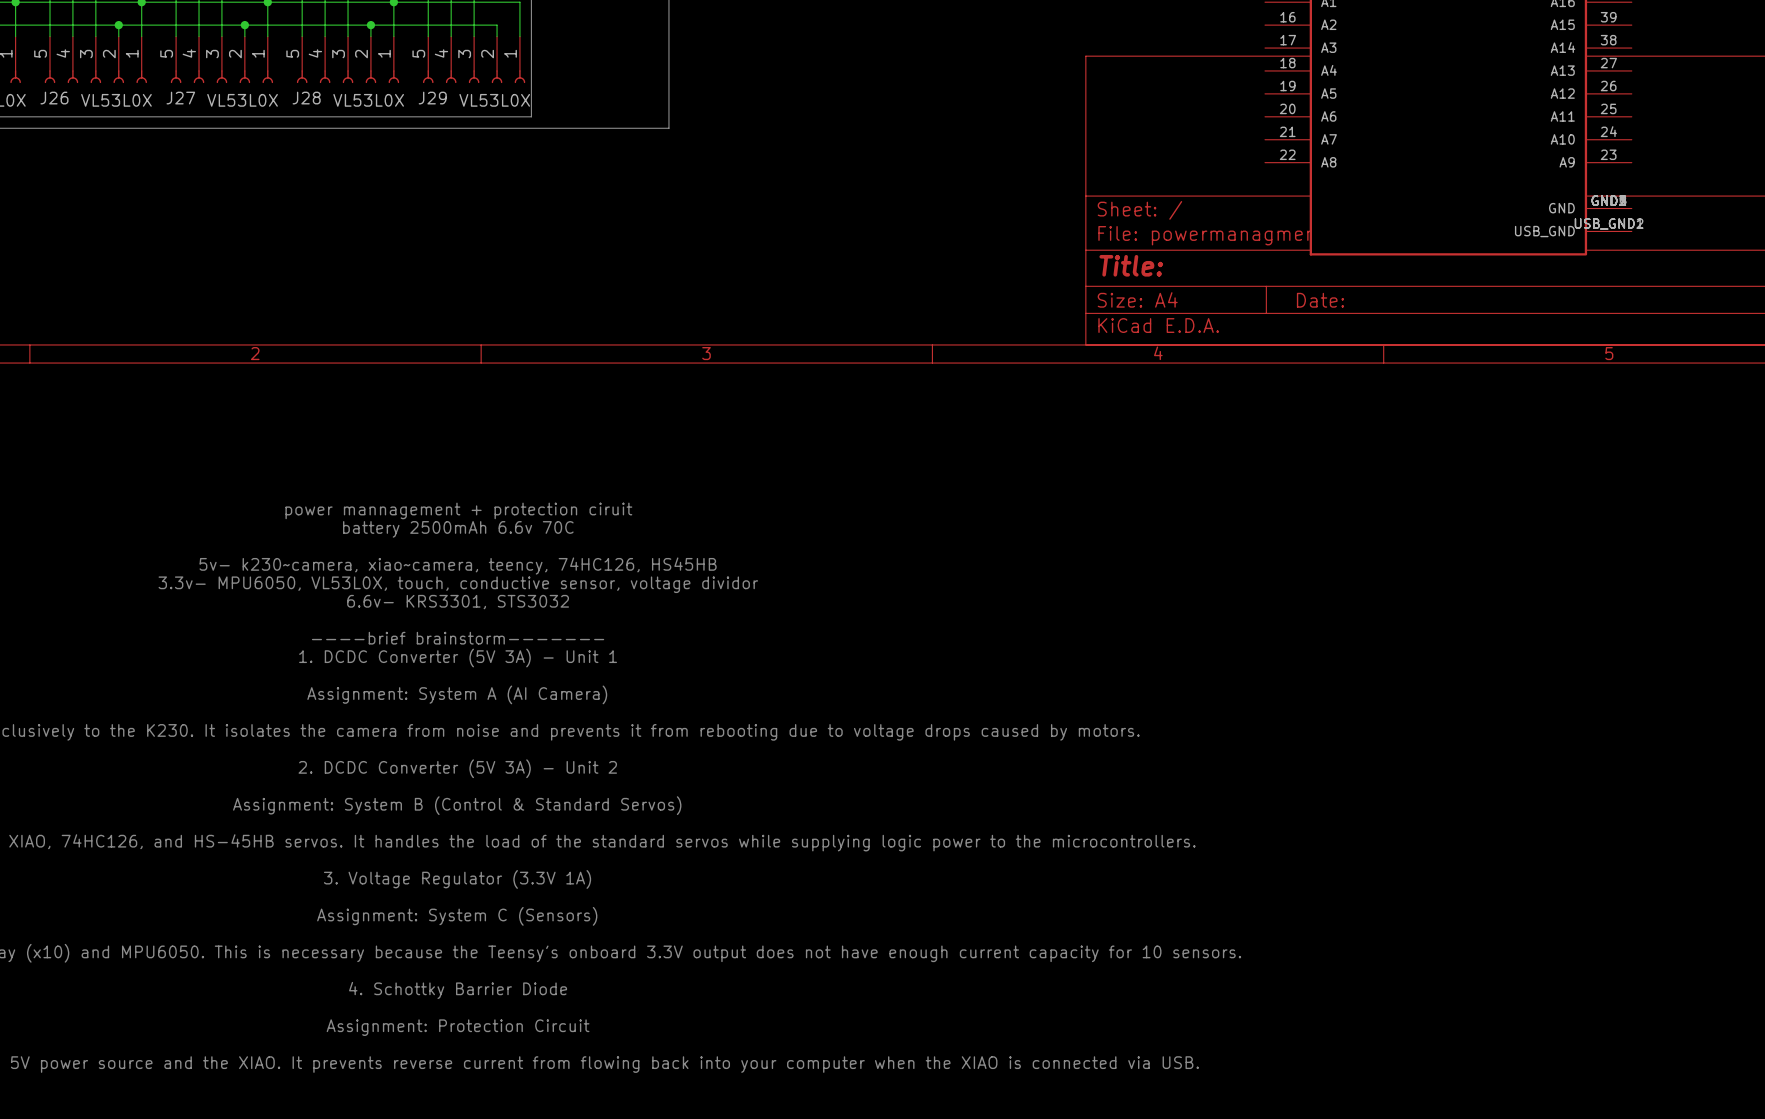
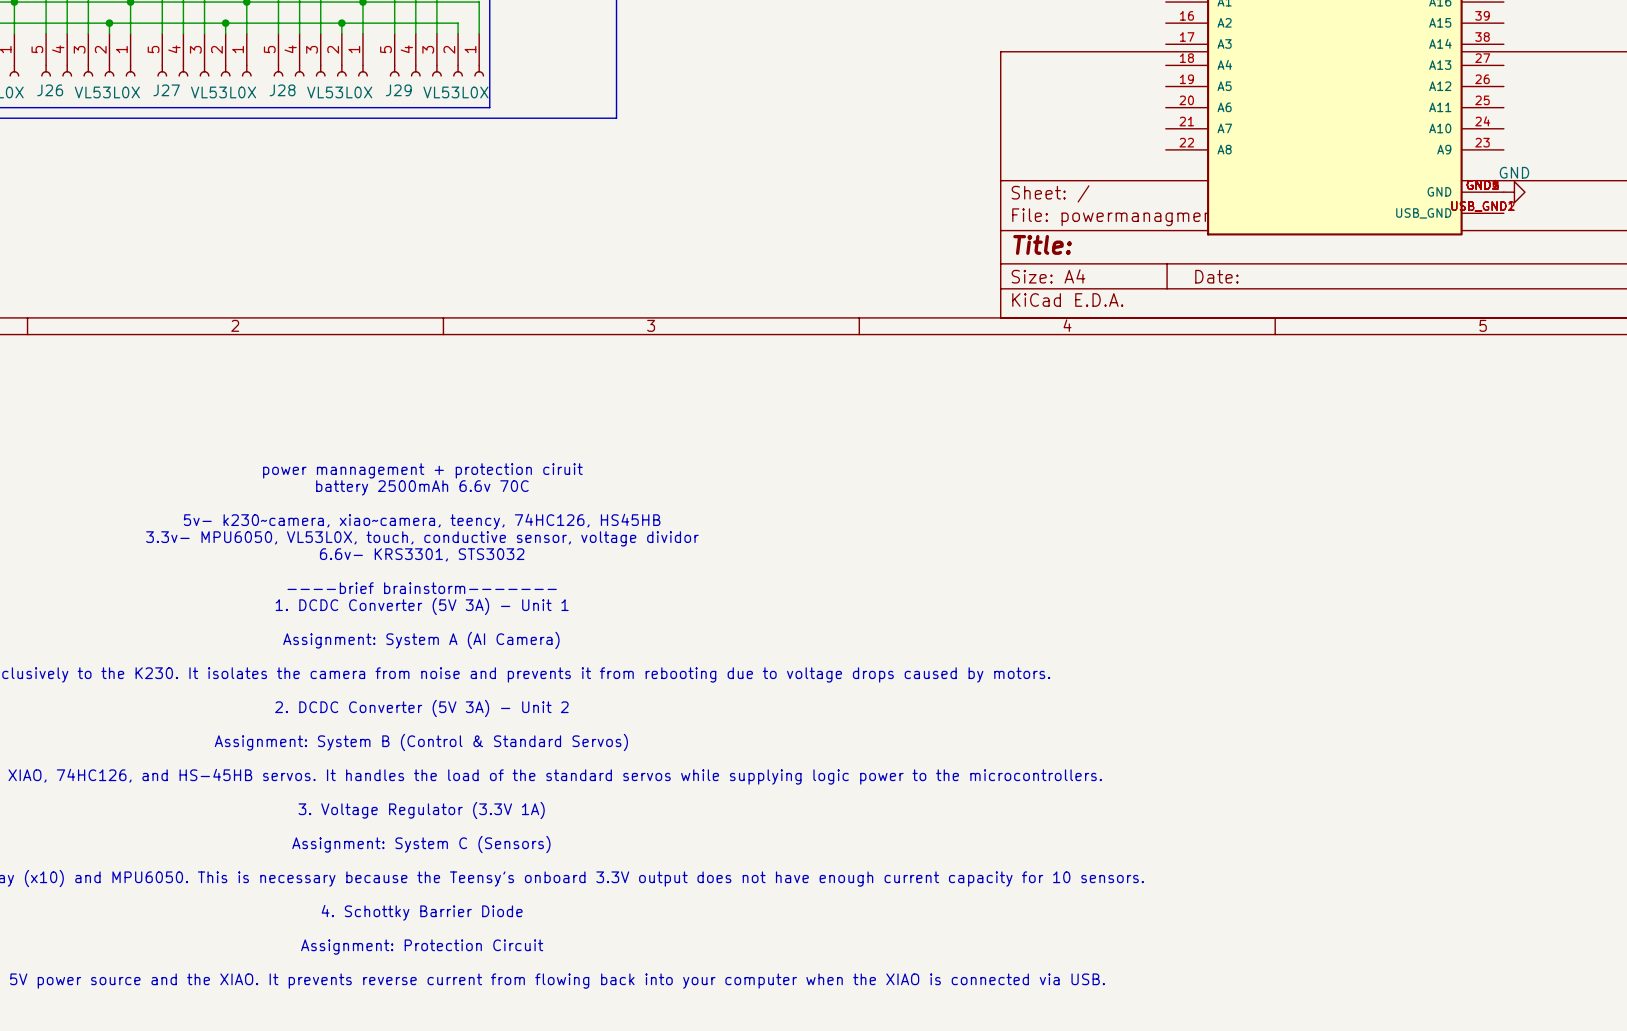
power symbol: none -> GND (1514, 192)

